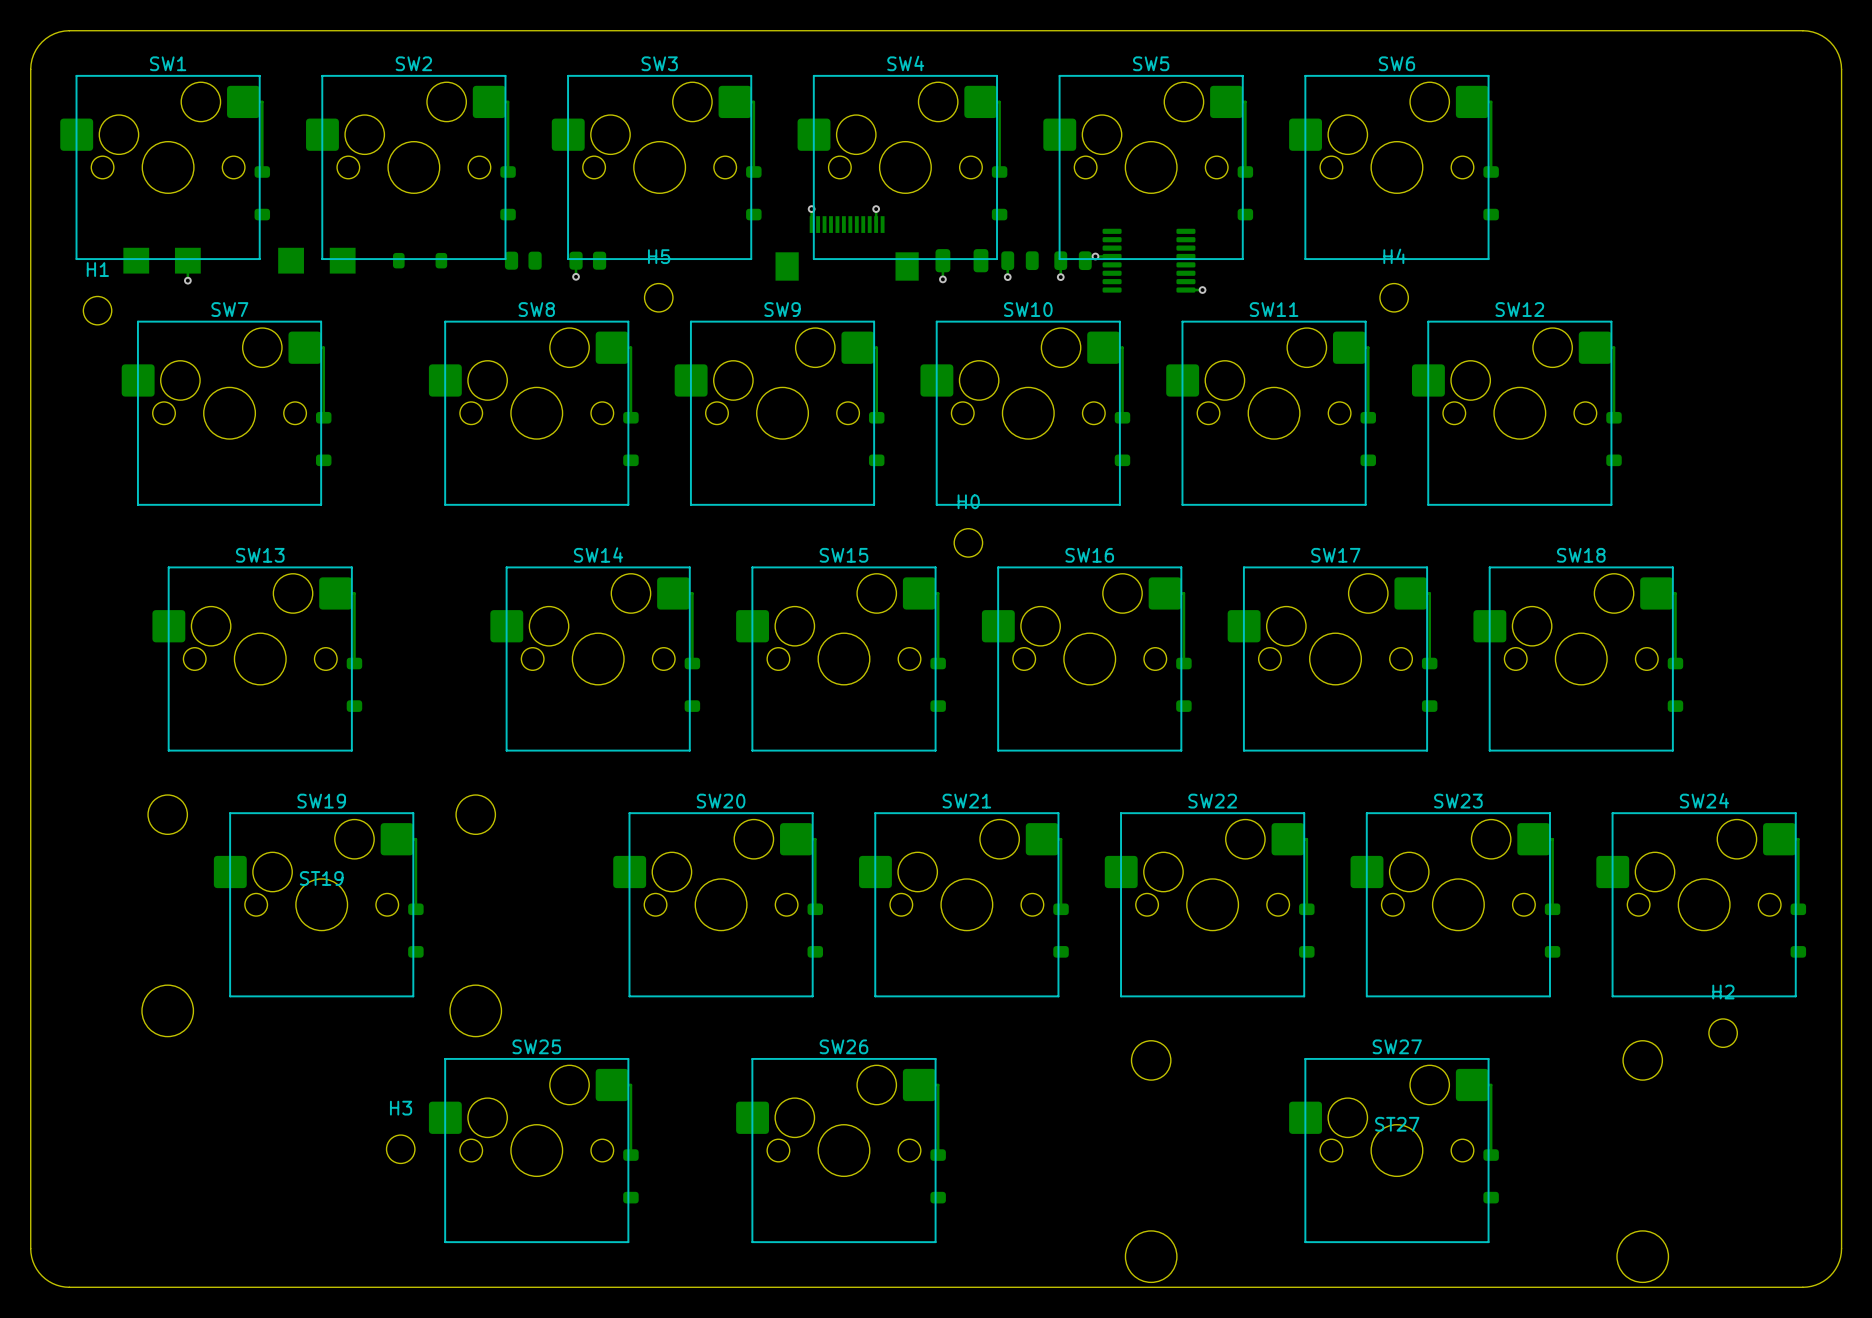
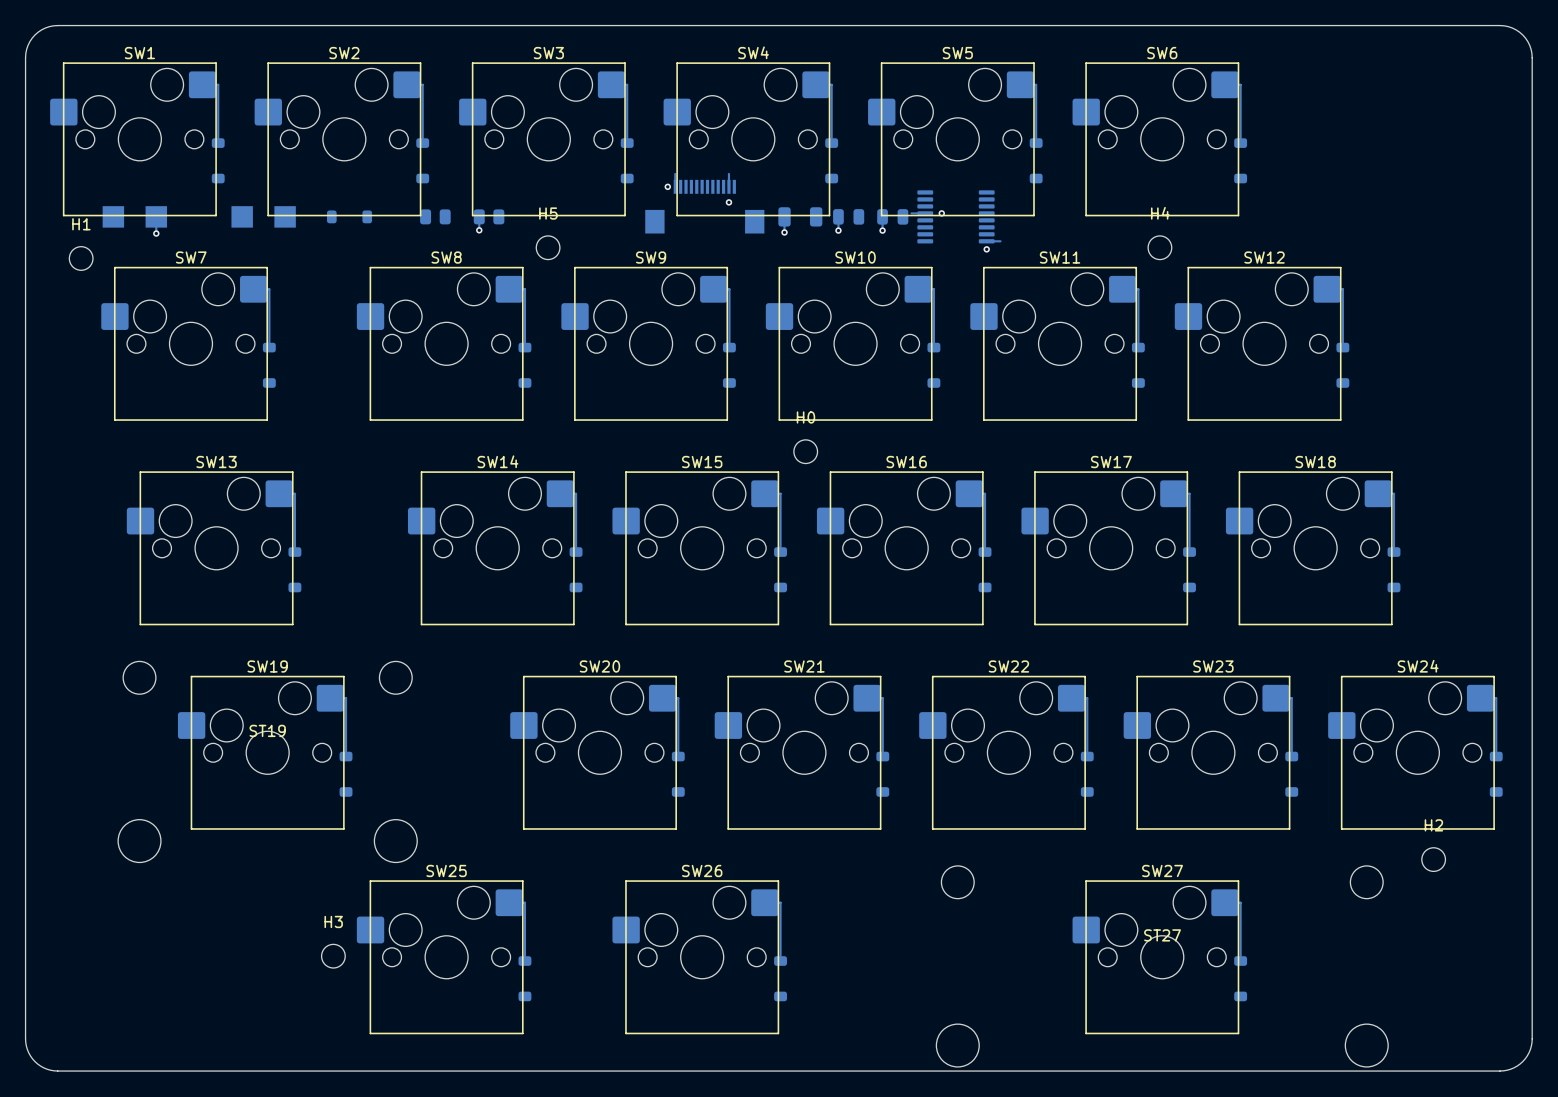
via position: (811, 209) -> (667, 186)
via position: (876, 209) -> (728, 202)
via position: (1095, 256) -> (941, 213)
via position: (1202, 290) -> (986, 249)

